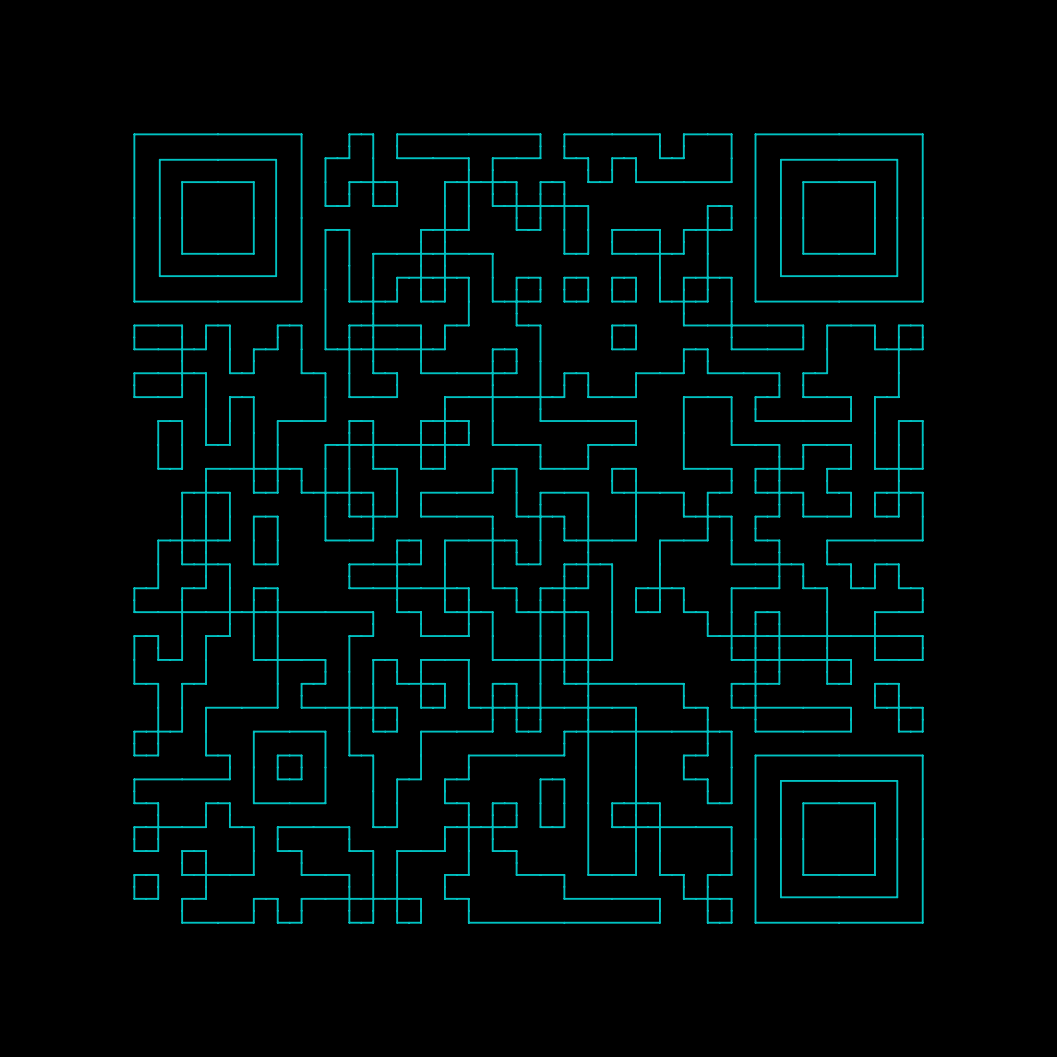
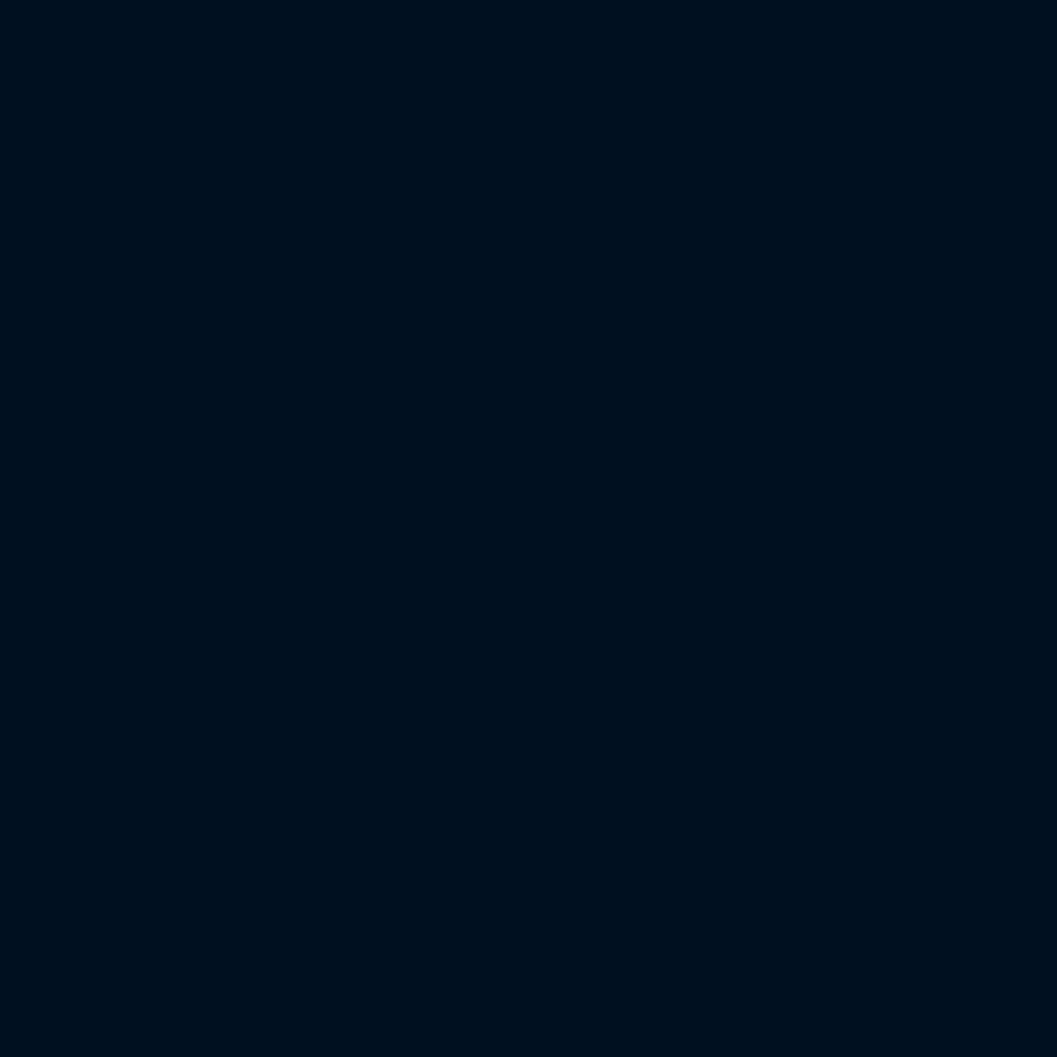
line: (301, 134) (301, 301) (134, 301) (134, 134) (301, 134) -> none
line: (373, 134) (373, 206) (397, 206) (397, 182) (349, 182) (349, 206) (325, 206) (325, 158) (349, 158) (349, 134) (373, 134) -> none
line: (540, 134) (540, 158) (492, 158) (492, 206) (588, 206) (588, 253) (564, 253) (564, 182) (540, 182) (540, 229) (516, 229) (516, 182) (444, 182) (444, 301) (421, 301) (421, 229) (468, 229) (468, 158) (397, 158) (397, 134) (540, 134) -> none
line: (731, 134) (683, 134) (683, 158) (659, 158) (659, 134) (564, 134) (564, 158) (588, 158) (588, 182) (612, 182) (612, 158) (636, 158) (636, 182) (731, 182) (731, 134) -> none
line: (922, 134) (755, 134) (755, 301) (922, 301) (922, 134) -> none
line: (276, 159) (159, 159) (159, 276) (276, 276) (276, 159) -> none
line: (897, 159) (897, 276) (780, 276) (780, 159) (897, 159) -> none
line: (253, 182) (182, 182) (182, 253) (253, 253) (253, 182) -> none
line: (874, 182) (803, 182) (803, 253) (874, 253) (874, 182) -> none
line: (731, 206) (707, 206) (707, 301) (659, 301) (659, 229) (612, 229) (612, 253) (683, 253) (683, 229) (731, 229) (731, 206) -> none
line: (349, 229) (349, 301) (397, 301) (397, 277) (468, 277) (468, 325) (444, 325) (444, 349) (325, 349) (325, 229) (349, 229) -> none
line: (492, 253) (492, 301) (540, 301) (540, 277) (516, 277) (516, 325) (540, 325) (540, 421) (636, 421) (636, 444) (588, 444) (588, 468) (540, 468) (540, 444) (492, 444) (492, 349) (516, 349) (516, 373) (421, 373) (421, 325) (349, 325) (349, 397) (397, 397) (397, 373) (373, 373) (373, 253) (492, 253) -> none
line: (588, 277) (588, 301) (564, 301) (564, 277) (588, 277) -> none
line: (636, 277) (612, 277) (612, 301) (636, 301) (636, 277) -> none
line: (731, 277) (683, 277) (683, 325) (803, 325) (803, 349) (731, 349) (731, 277) -> none
line: (301, 325) (301, 373) (325, 373) (325, 421) (277, 421) (277, 492) (253, 492) (253, 397) (229, 397) (229, 444) (206, 444) (206, 373) (134, 373) (134, 397) (182, 397) (182, 325) (134, 325) (134, 349) (206, 349) (206, 325) (229, 325) (229, 373) (253, 373) (253, 349) (277, 349) (277, 325) (301, 325) -> none
line: (636, 325) (612, 325) (612, 349) (636, 349) (636, 325) -> none
line: (922, 325) (898, 325) (898, 397) (874, 397) (874, 468) (922, 468) (922, 421) (898, 421) (898, 516) (874, 516) (874, 492) (922, 492) (922, 540) (827, 540) (827, 564) (851, 564) (851, 588) (874, 588) (874, 564) (898, 564) (898, 588) (922, 588) (922, 612) (874, 612) (874, 659) (922, 659) (922, 636) (707, 636) (707, 612) (683, 612) (683, 588) (636, 588) (636, 612) (659, 612) (659, 540) (707, 540) (707, 492) (731, 492) (731, 468) (683, 468) (683, 397) (731, 397) (731, 444) (779, 444) (779, 516) (755, 516) (755, 540) (779, 540) (779, 588) (731, 588) (731, 659) (851, 659) (851, 683) (827, 683) (827, 588) (803, 588) (803, 564) (731, 564) (731, 516) (683, 516) (683, 492) (612, 492) (612, 468) (636, 468) (636, 540) (564, 540) (564, 516) (516, 516) (516, 468) (492, 468) (492, 492) (421, 492) (421, 516) (492, 516) (492, 588) (516, 588) (516, 612) (588, 612) (588, 874) (636, 874) (636, 707) (468, 707) (468, 659) (421, 659) (421, 707) (444, 707) (444, 683) (397, 683) (397, 659) (373, 659) (373, 731) (397, 731) (397, 707) (301, 707) (301, 683) (325, 683) (325, 659) (253, 659) (253, 588) (277, 588) (277, 707) (206, 707) (206, 755) (229, 755) (229, 779) (134, 779) (134, 803) (158, 803) (158, 851) (134, 851) (134, 827) (206, 827) (206, 803) (229, 803) (229, 827) (253, 827) (253, 874) (182, 874) (182, 851) (206, 851) (206, 898) (182, 898) (182, 922) (253, 922) (253, 898) (277, 898) (277, 922) (301, 922) (301, 898) (421, 898) (421, 922) (397, 922) (397, 851) (444, 851) (444, 827) (516, 827) (516, 803) (492, 803) (492, 851) (516, 851) (516, 874) (564, 874) (564, 898) (659, 898) (659, 922) (468, 922) (468, 898) (444, 898) (444, 874) (468, 874) (468, 803) (444, 803) (444, 779) (468, 779) (468, 755) (564, 755) (564, 731) (731, 731) (731, 803) (707, 803) (707, 779) (683, 779) (683, 755) (707, 755) (707, 707) (683, 707) (683, 683) (564, 683) (564, 564) (612, 564) (612, 659) (492, 659) (492, 612) (444, 612) (444, 540) (516, 540) (516, 564) (540, 564) (540, 492) (588, 492) (588, 588) (540, 588) (540, 731) (516, 731) (516, 683) (492, 683) (492, 731) (421, 731) (421, 779) (397, 779) (397, 827) (373, 827) (373, 755) (349, 755) (349, 636) (373, 636) (373, 612) (134, 612) (134, 588) (158, 588) (158, 540) (229, 540) (229, 492) (182, 492) (182, 564) (229, 564) (229, 636) (206, 636) (206, 683) (182, 683) (182, 731) (134, 731) (134, 755) (158, 755) (158, 683) (134, 683) (134, 636) (158, 636) (158, 659) (182, 659) (182, 588) (206, 588) (206, 468) (301, 468) (301, 492) (373, 492) (373, 540) (325, 540) (325, 444) (468, 444) (468, 421) (421, 421) (421, 468) (444, 468) (444, 397) (564, 397) (564, 373) (588, 373) (588, 397) (636, 397) (636, 373) (683, 373) (683, 349) (707, 349) (707, 373) (779, 373) (779, 397) (755, 397) (755, 421) (851, 421) (851, 397) (803, 397) (803, 373) (827, 373) (827, 325) (874, 325) (874, 349) (922, 349) (922, 325) -> none
line: (182, 421) (182, 468) (158, 468) (158, 421) (182, 421) -> none
line: (373, 421) (373, 468) (397, 468) (397, 516) (349, 516) (349, 421) (373, 421) -> none
line: (851, 444) (851, 468) (827, 468) (827, 492) (851, 492) (851, 516) (803, 516) (803, 492) (755, 492) (755, 468) (803, 468) (803, 444) (851, 444) -> none
line: (277, 516) (277, 564) (253, 564) (253, 516) (277, 516) -> none
line: (421, 540) (397, 540) (397, 612) (421, 612) (421, 636) (468, 636) (468, 588) (349, 588) (349, 564) (421, 564) (421, 540) -> none
line: (779, 612) (755, 612) (755, 731) (851, 731) (851, 707) (731, 707) (731, 683) (779, 683) (779, 612) -> none
line: (898, 683) (874, 683) (874, 707) (922, 707) (922, 731) (898, 731) (898, 683) -> none
line: (325, 731) (253, 731) (253, 803) (325, 803) (325, 731) -> none
line: (301, 755) (301, 779) (277, 779) (277, 755) (301, 755) -> none
line: (922, 755) (755, 755) (755, 922) (922, 922) (922, 755) -> none
line: (564, 779) (540, 779) (540, 827) (564, 827) (564, 779) -> none
line: (897, 780) (897, 897) (780, 897) (780, 780) (897, 780) -> none
line: (659, 803) (612, 803) (612, 827) (731, 827) (731, 874) (707, 874) (707, 922) (731, 922) (731, 898) (683, 898) (683, 874) (659, 874) (659, 803) -> none
line: (874, 803) (803, 803) (803, 874) (874, 874) (874, 803) -> none
line: (349, 827) (349, 851) (373, 851) (373, 922) (349, 922) (349, 874) (301, 874) (301, 851) (277, 851) (277, 827) (349, 827) -> none
line: (158, 874) (134, 874) (134, 898) (158, 898) (158, 874) -> none

